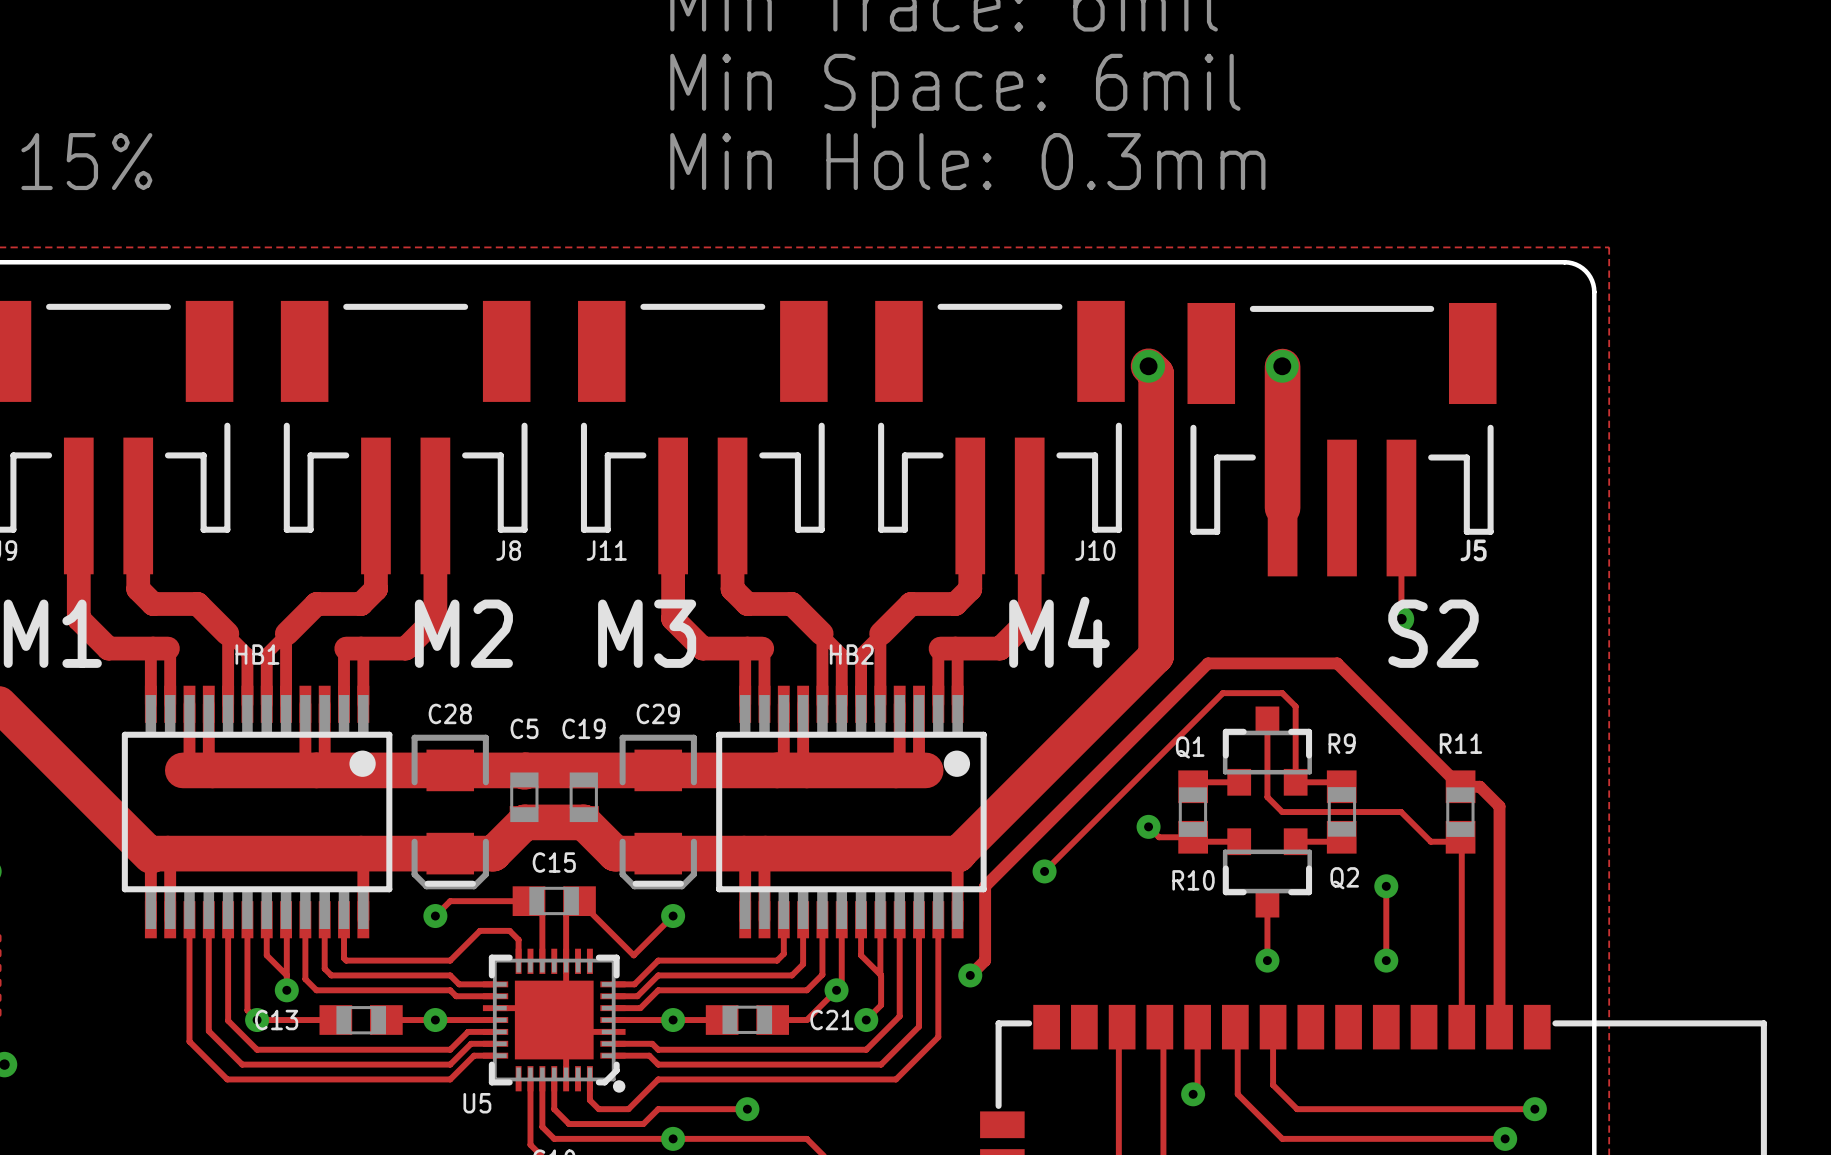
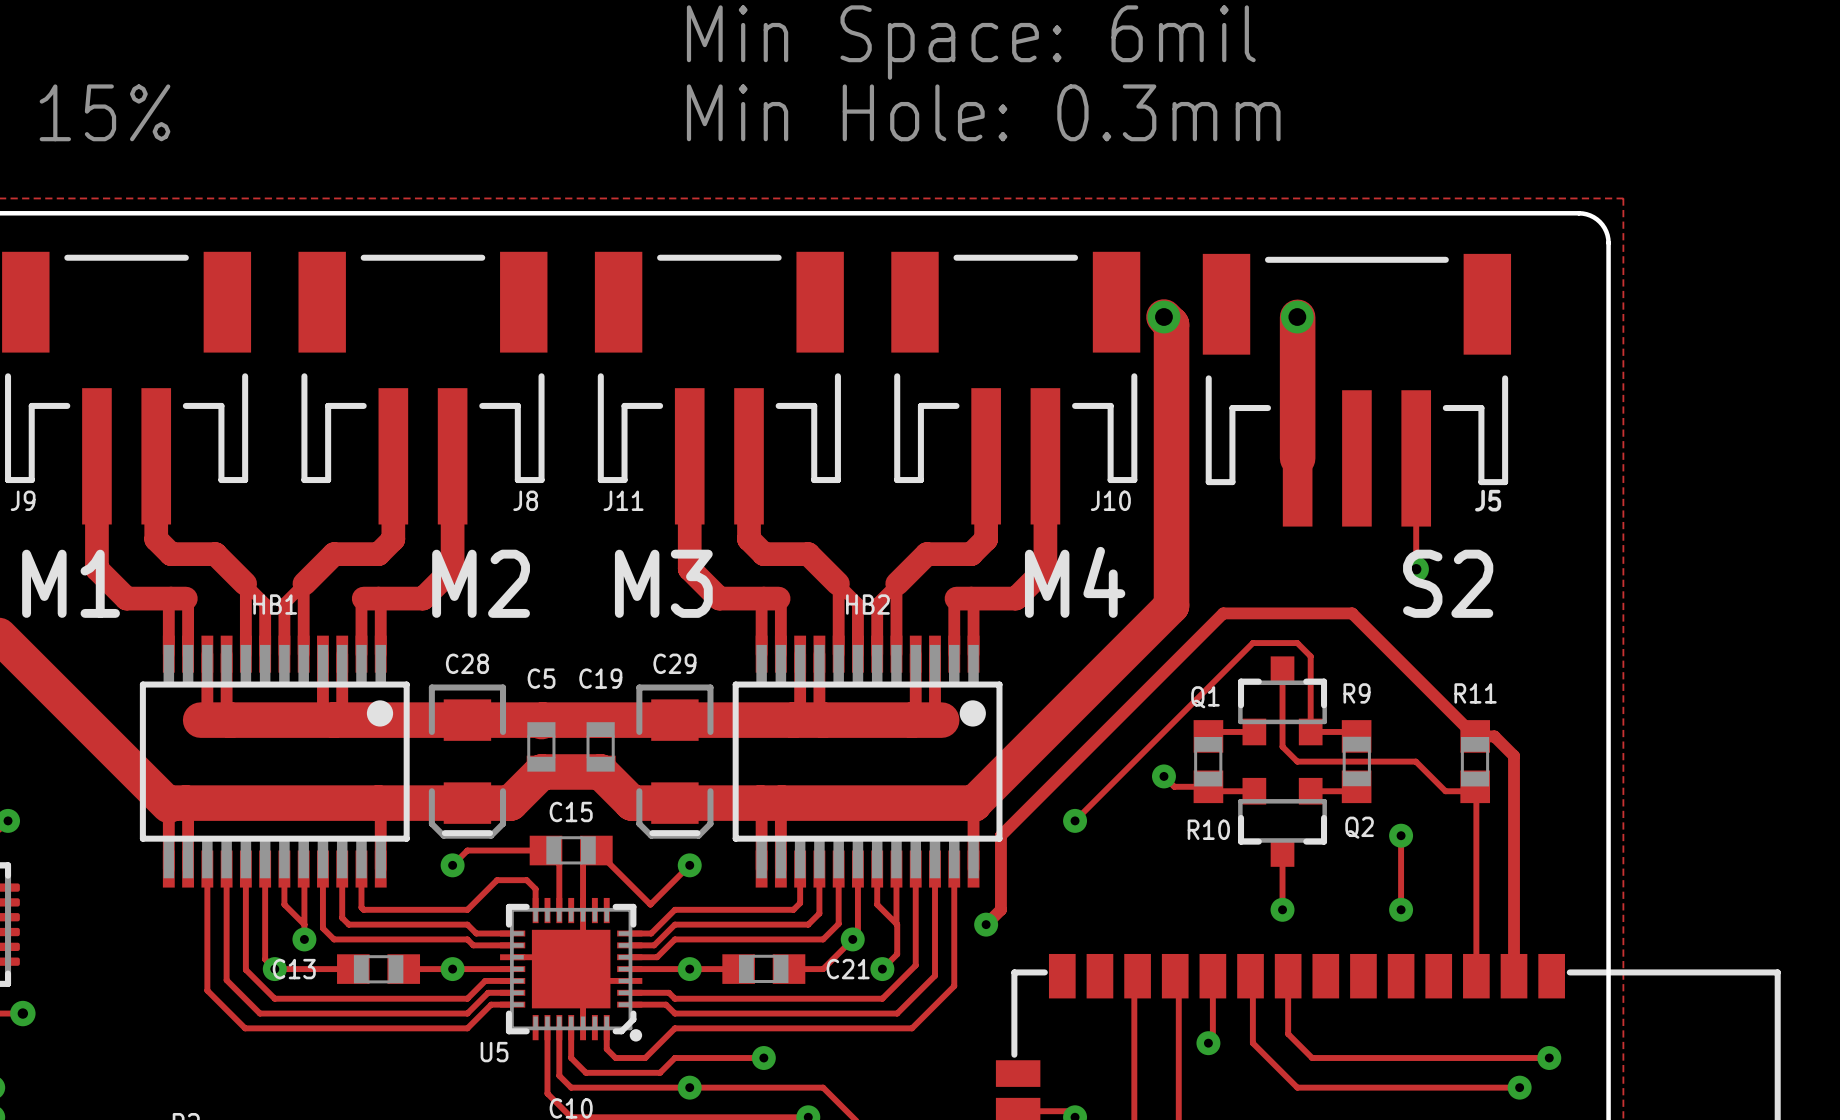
track: (1237, 693) (1222, 693) (1044, 871) -> (1252, 643) (1075, 820)
via position: (1044, 871) -> (1075, 820)

